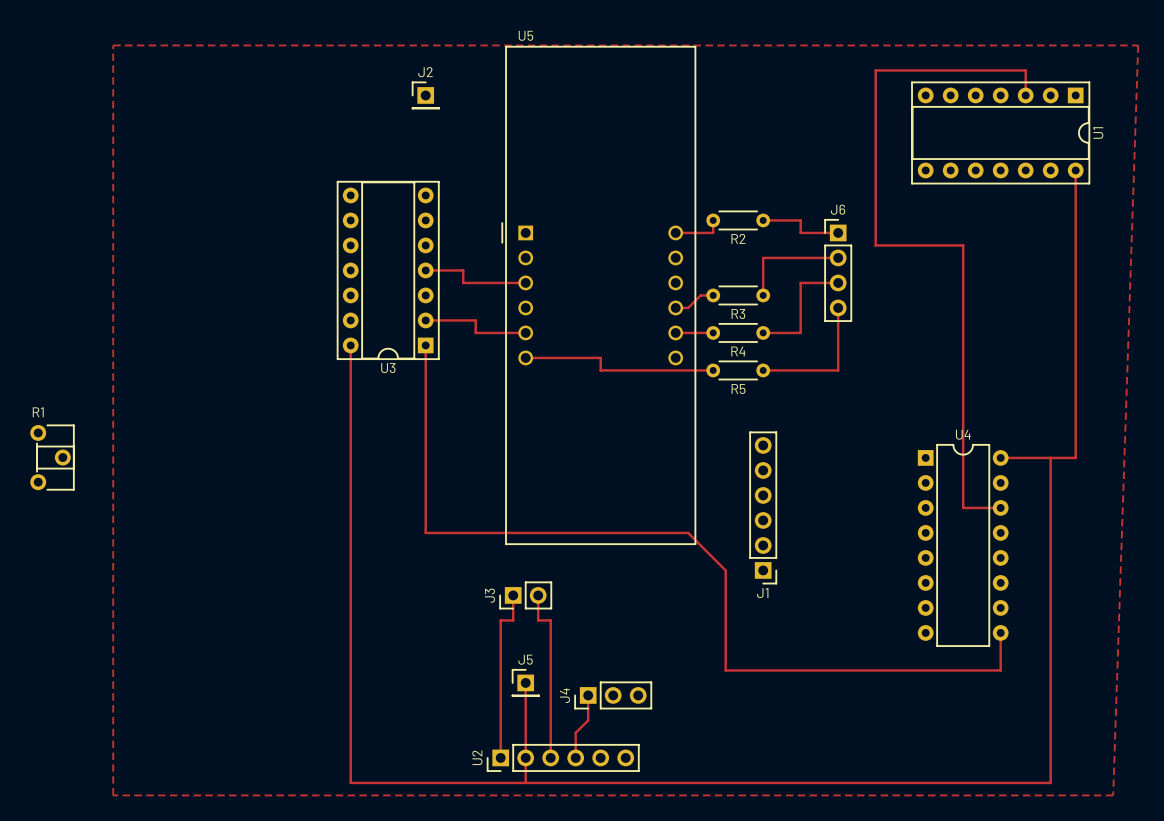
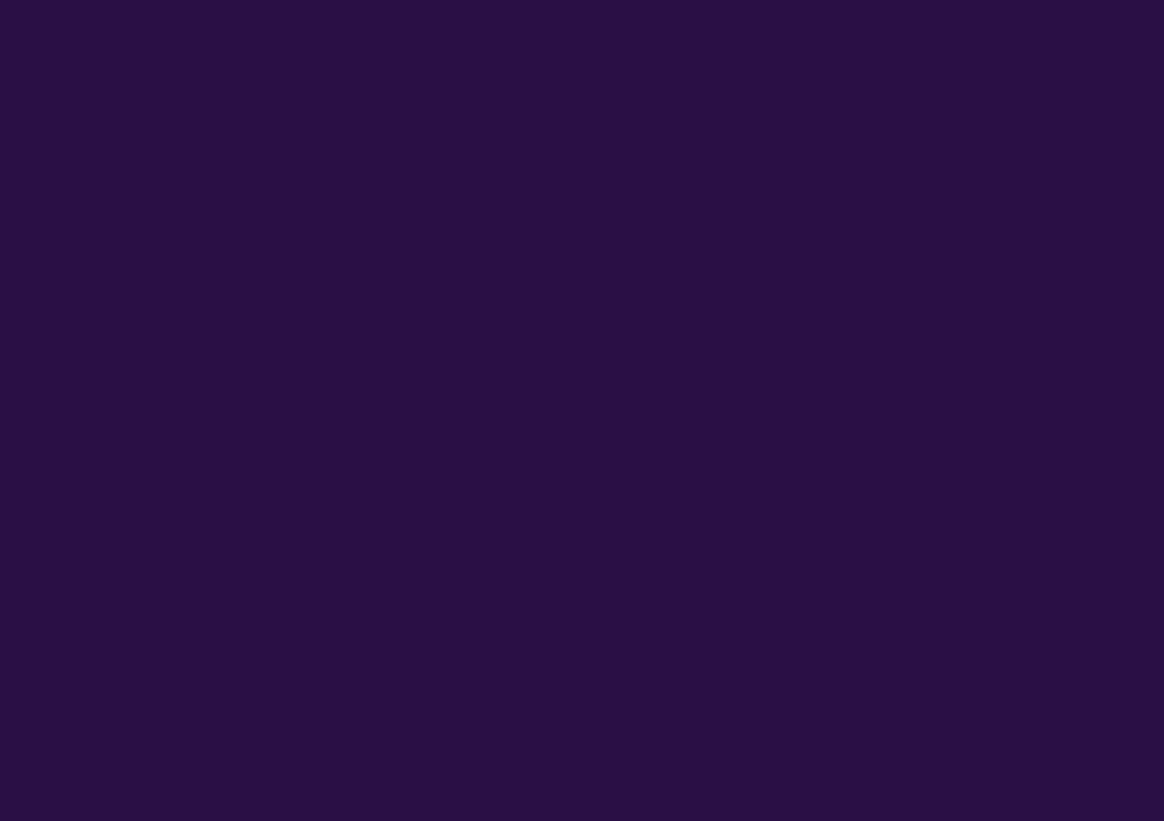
zone outline: (113, 45) (113, 795) (1113, 795) (1138, 45) (113, 45) -> none
J2: (425, 95) -> none
track: (1025, 95) (1025, 70) (875, 70) (875, 245) (963, 245) (963, 507) (1000, 507) -> none
U1: (1000, 132) -> none
track: (1075, 170) (1075, 457) (1000, 457) -> none
track: (713, 220) (713, 232) (675, 232) -> none
R2: (738, 220) -> none
track: (763, 220) (800, 220) (800, 232) (838, 232) -> none
track: (838, 257) (763, 257) (763, 295) -> none
U3: (388, 270) -> none
track: (425, 270) (463, 270) (463, 282) (525, 282) -> none
J6: (838, 270) -> none
track: (838, 282) (800, 282) (800, 332) (763, 332) -> none
U5: (598, 295) -> none
track: (713, 295) (700, 295) (688, 307) (675, 307) -> none
R3: (738, 295) -> none
track: (838, 307) (838, 370) (763, 370) -> none
track: (425, 320) (475, 320) (475, 332) (525, 332) -> none
track: (675, 332) (713, 332) -> none
R4: (738, 332) -> none
track: (350, 345) (350, 782) (1050, 782) (1050, 457) -> none
track: (425, 345) (425, 532) (688, 532) (725, 570) (725, 670) (1000, 670) (1000, 632) -> none
track: (525, 357) (600, 357) (600, 370) (713, 370) -> none
R5: (738, 370) -> none
R1: (52, 457) -> none
J1: (763, 507) -> none
U4: (963, 545) -> none
track: (513, 595) (513, 620) (500, 620) (500, 757) -> none
J3: (525, 595) -> none
track: (538, 595) (538, 620) (550, 620) (550, 757) -> none
track: (525, 682) (525, 782) -> none
J5: (525, 682) -> none
track: (588, 695) (588, 720) (575, 732) (575, 757) -> none
J4: (613, 695) -> none
U2: (563, 757) -> none

